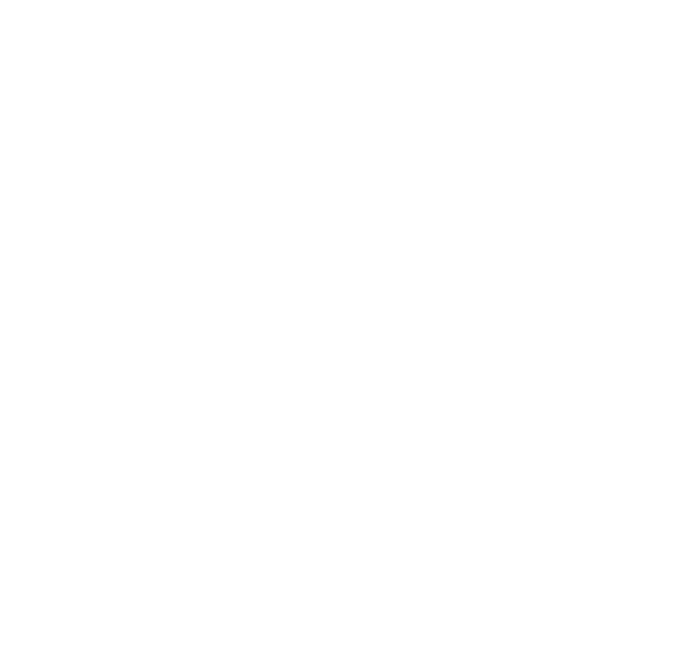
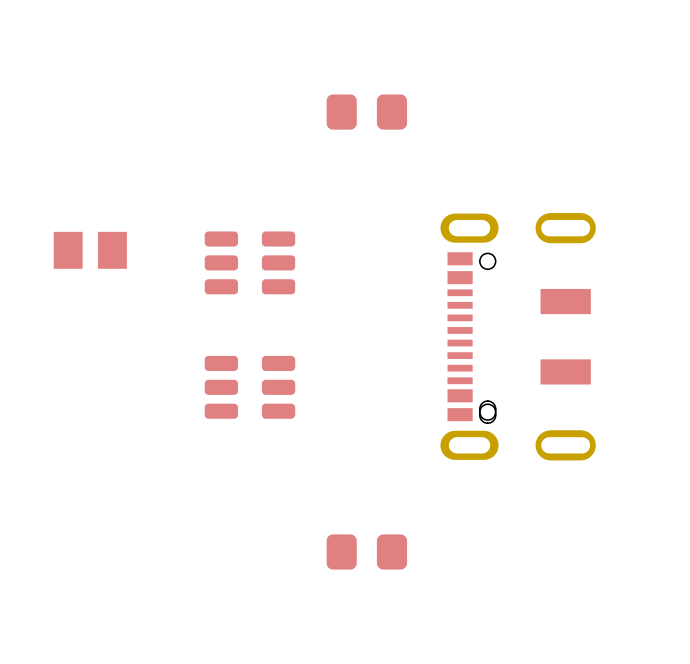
part: none -> (366, 112)
part: none -> (90, 250)
part: none -> (249, 262)
part: none -> (518, 336)
part: none -> (249, 387)
part: none -> (366, 551)

